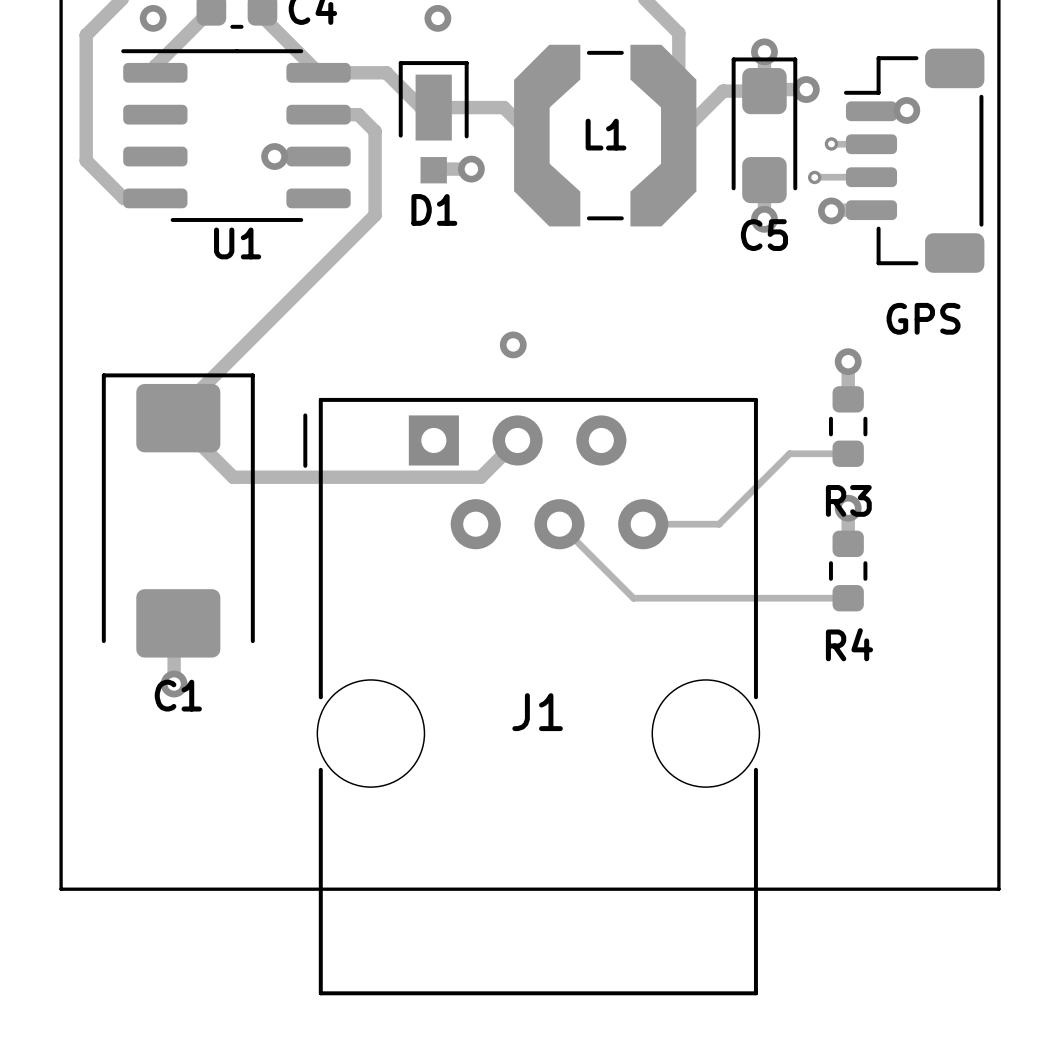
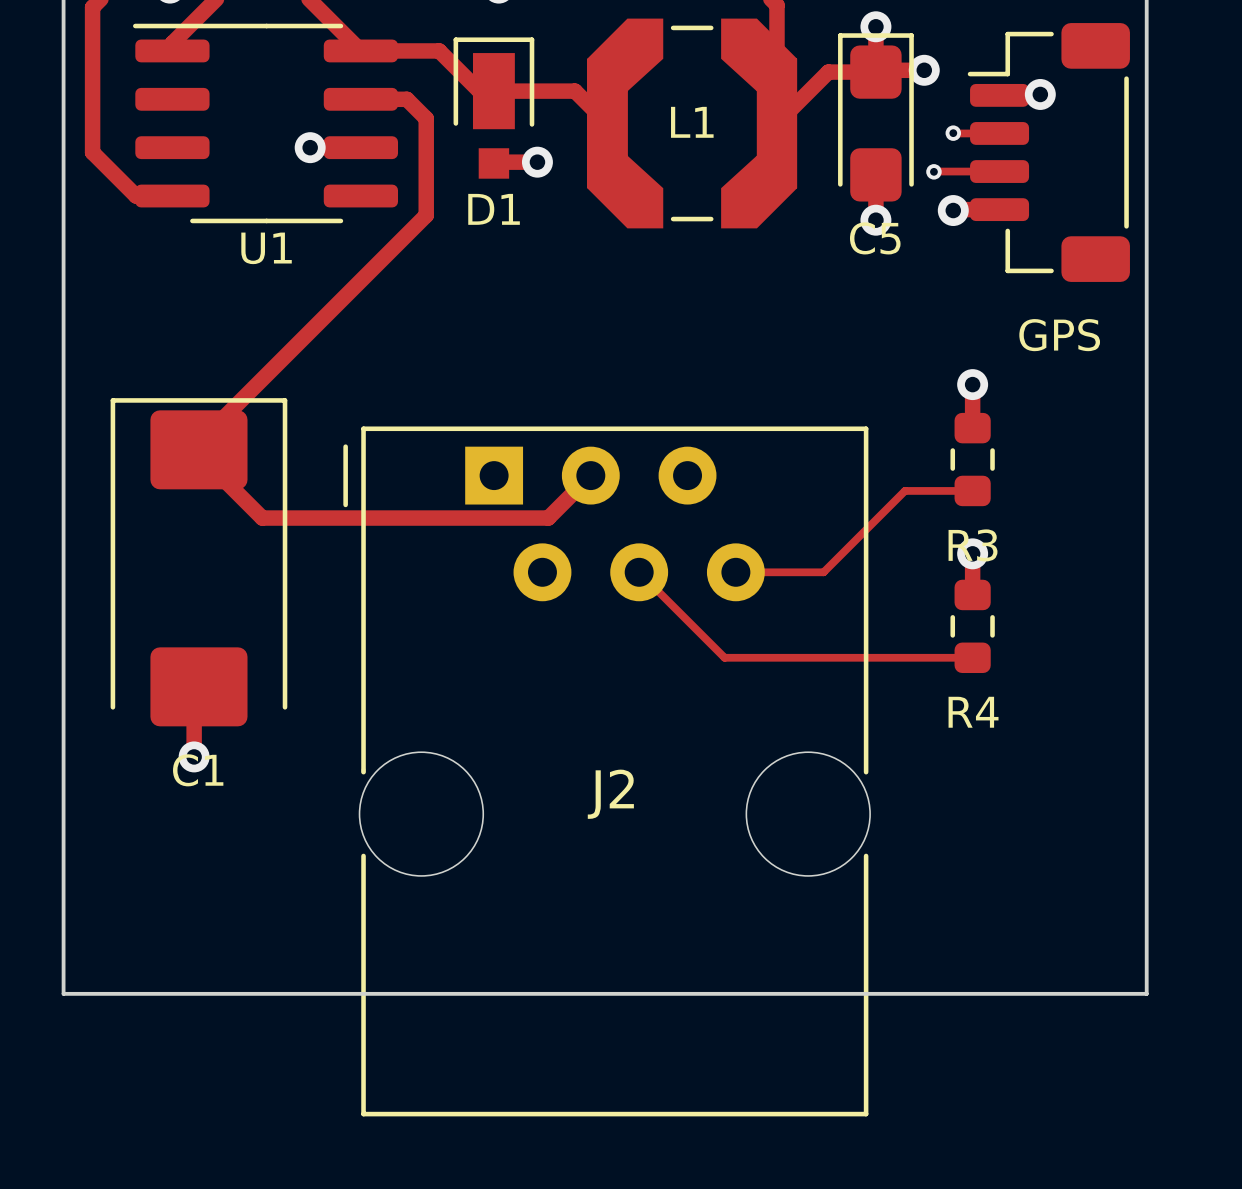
via: (513, 344) -> none
J1 name: J1 (537, 712) -> J2 (610, 794)

